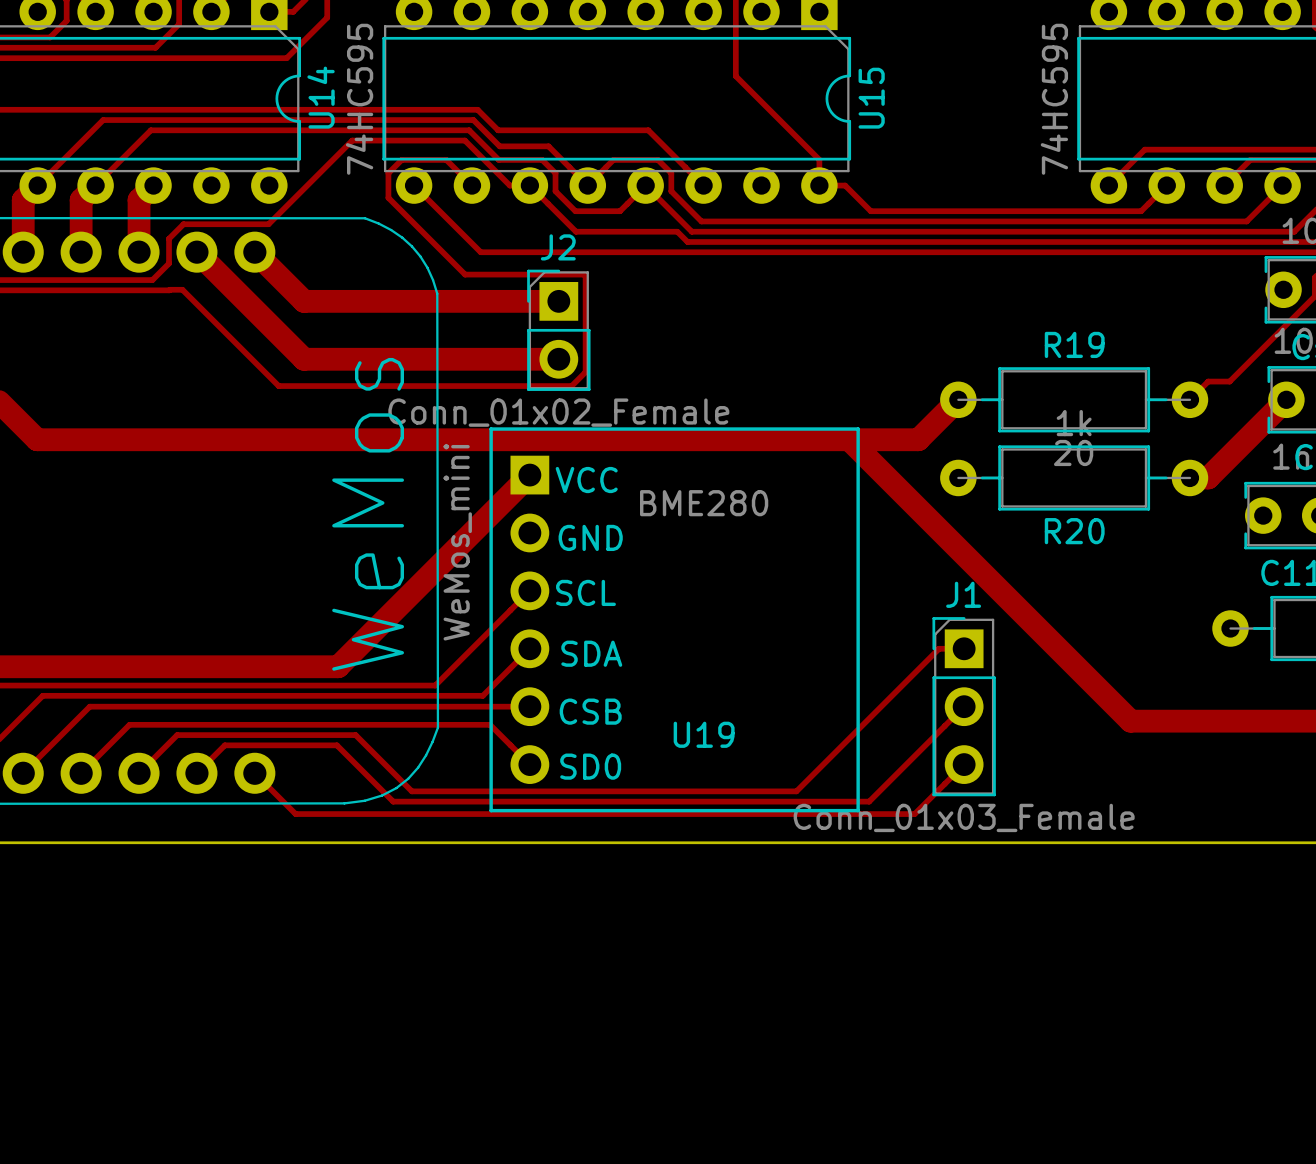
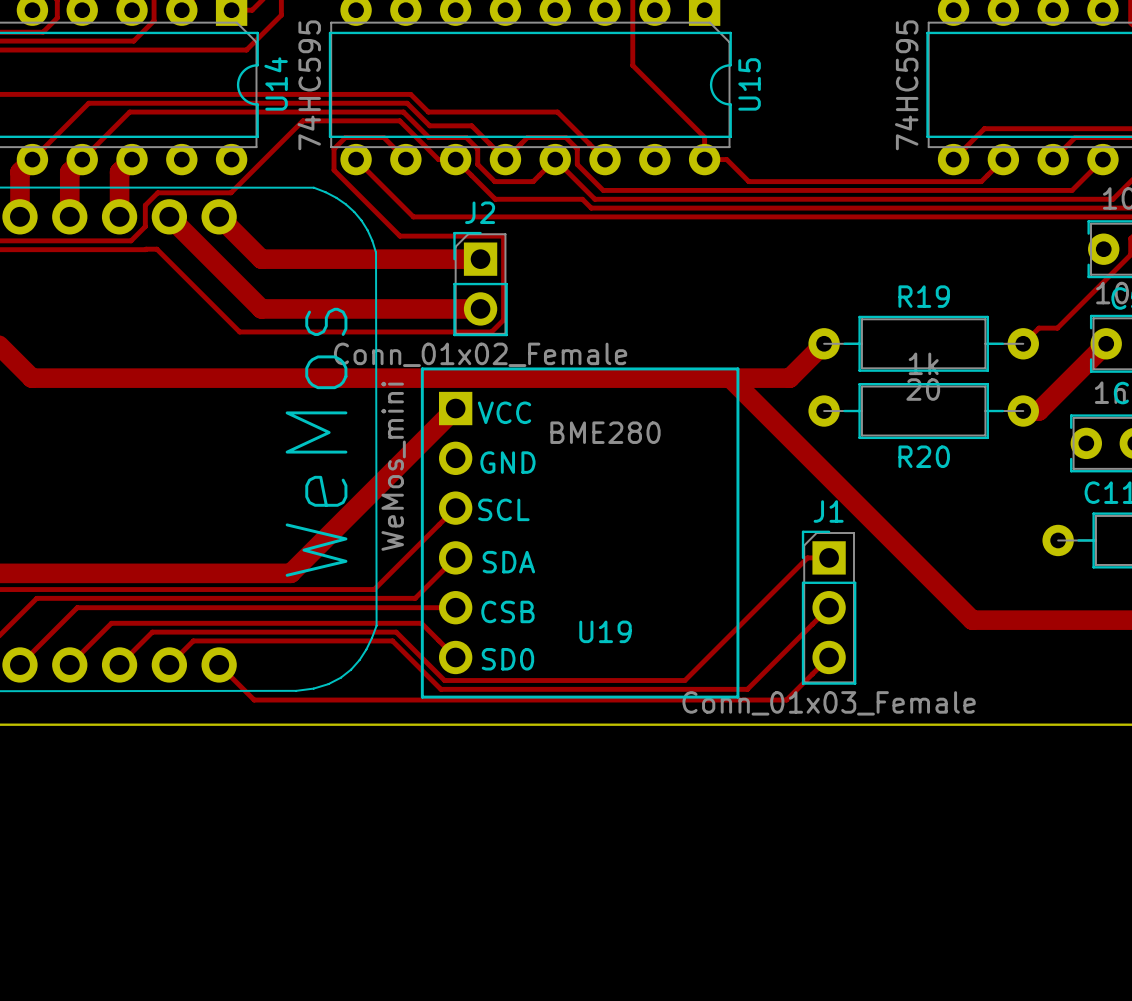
track: (355, 735) (411, 791) (517, 791) -> (305, 632) (396, 632) (444, 680)
track: (336, 745) (393, 801) (512, 801) -> (289, 640) (392, 640) (440, 689)

